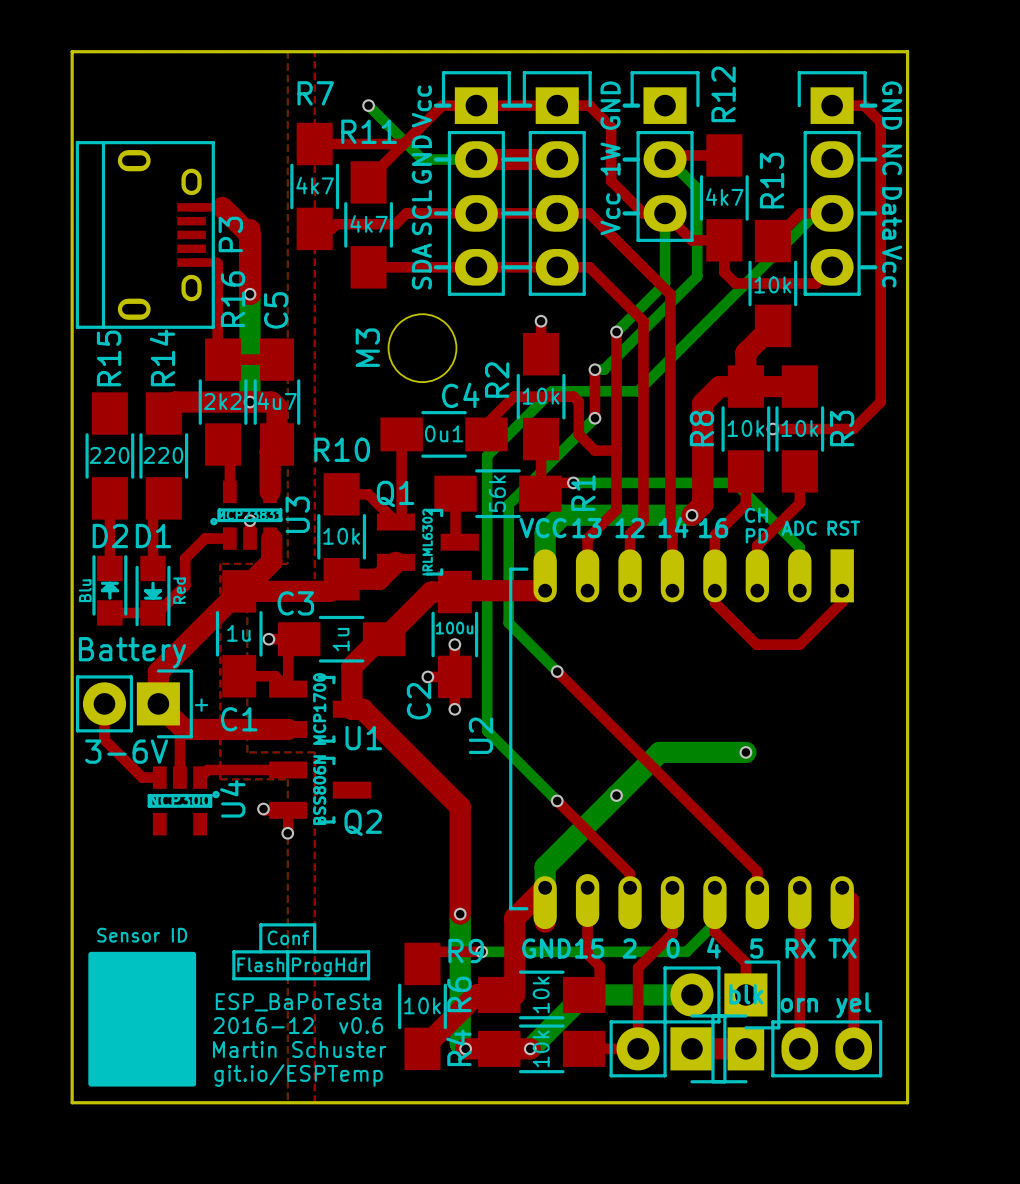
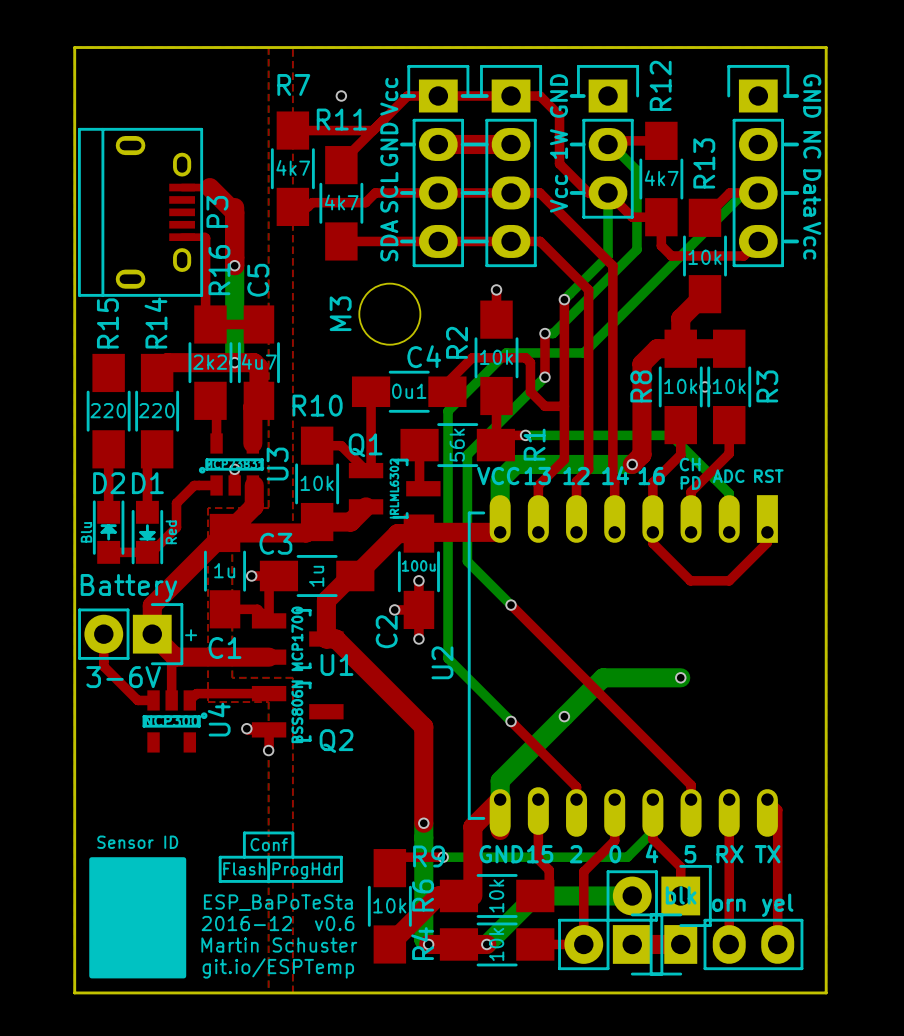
bottom track: (368, 105) (422, 159) (476, 159) -> none
top track: (832, 105) (864, 105) (880, 121) (880, 402) (853, 429) (772, 429) -> none

